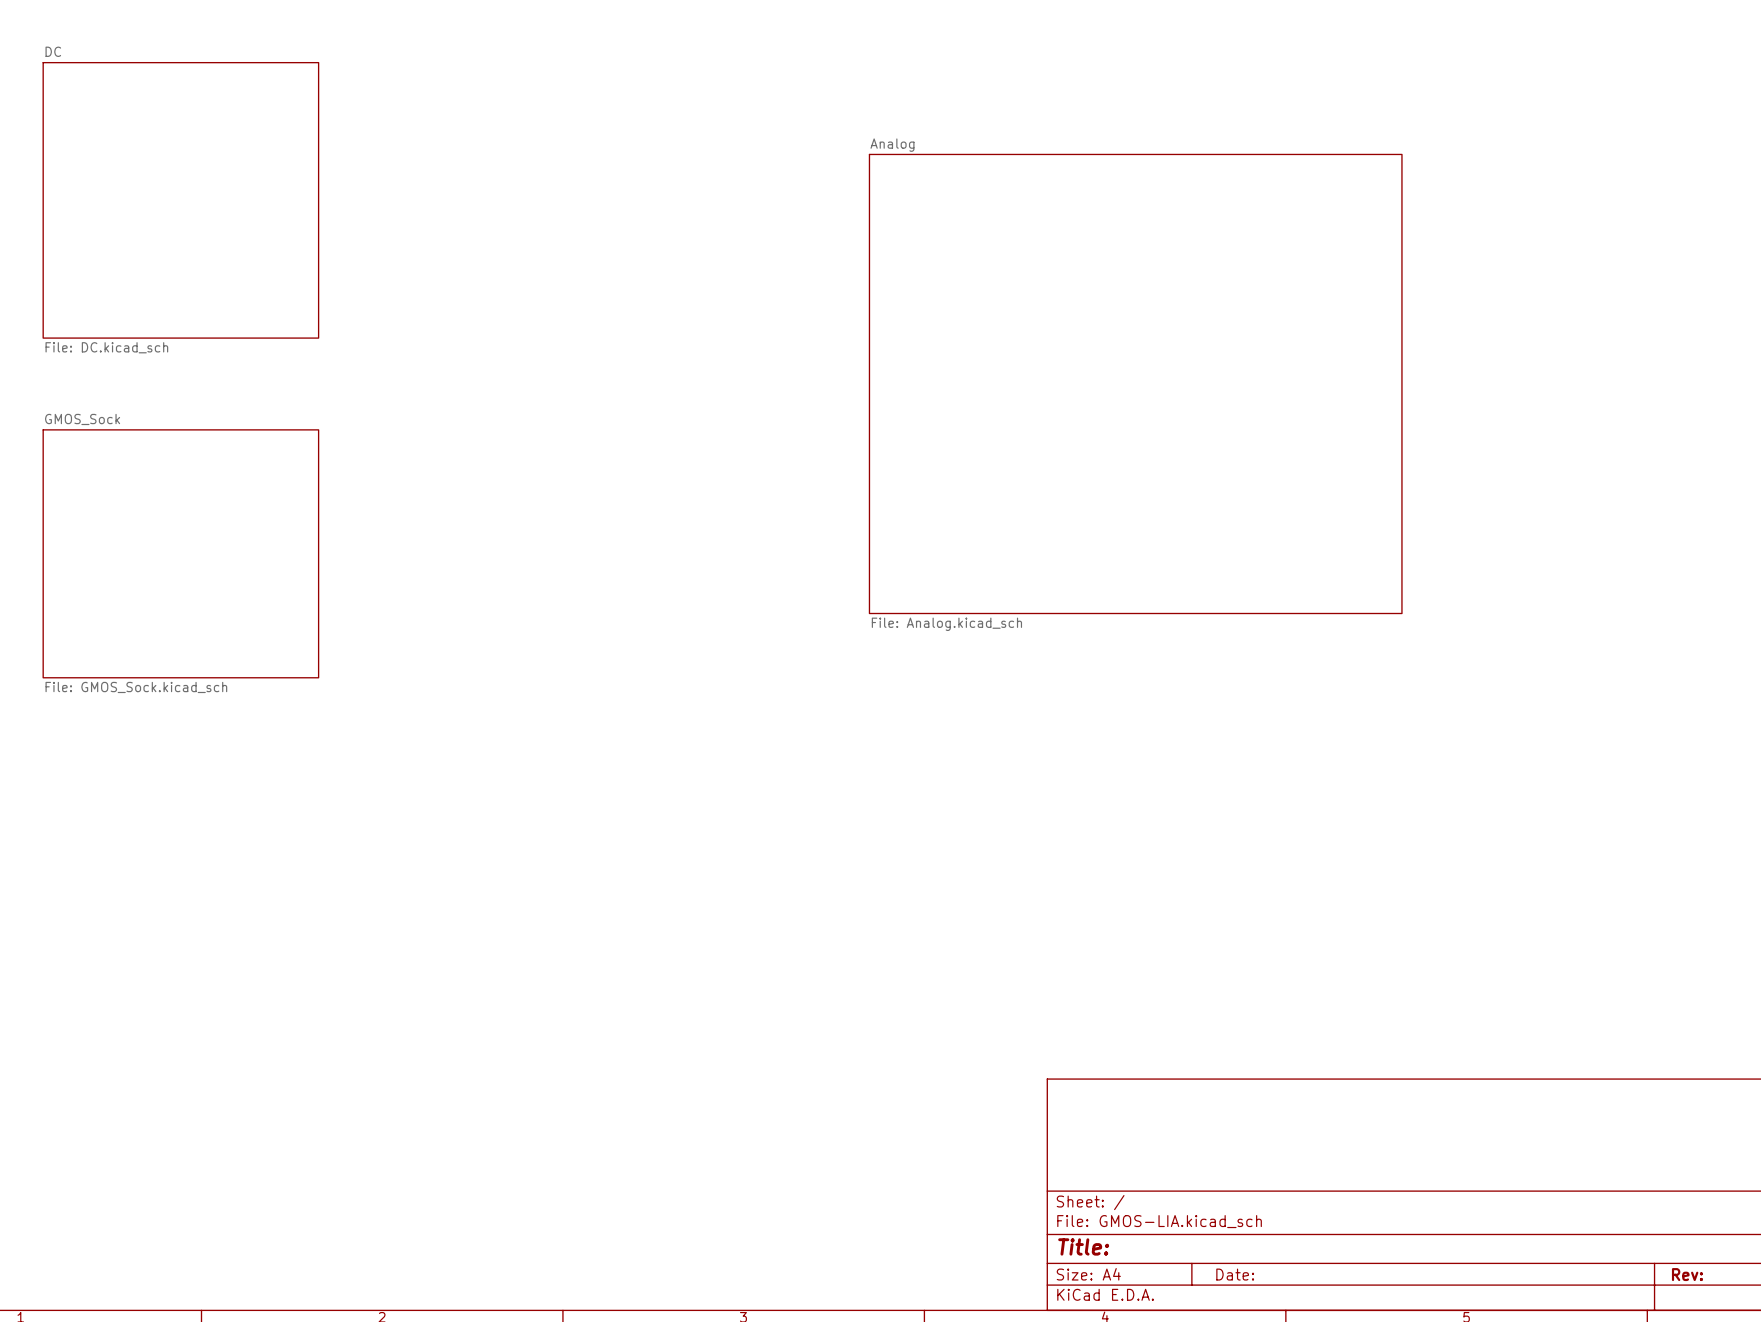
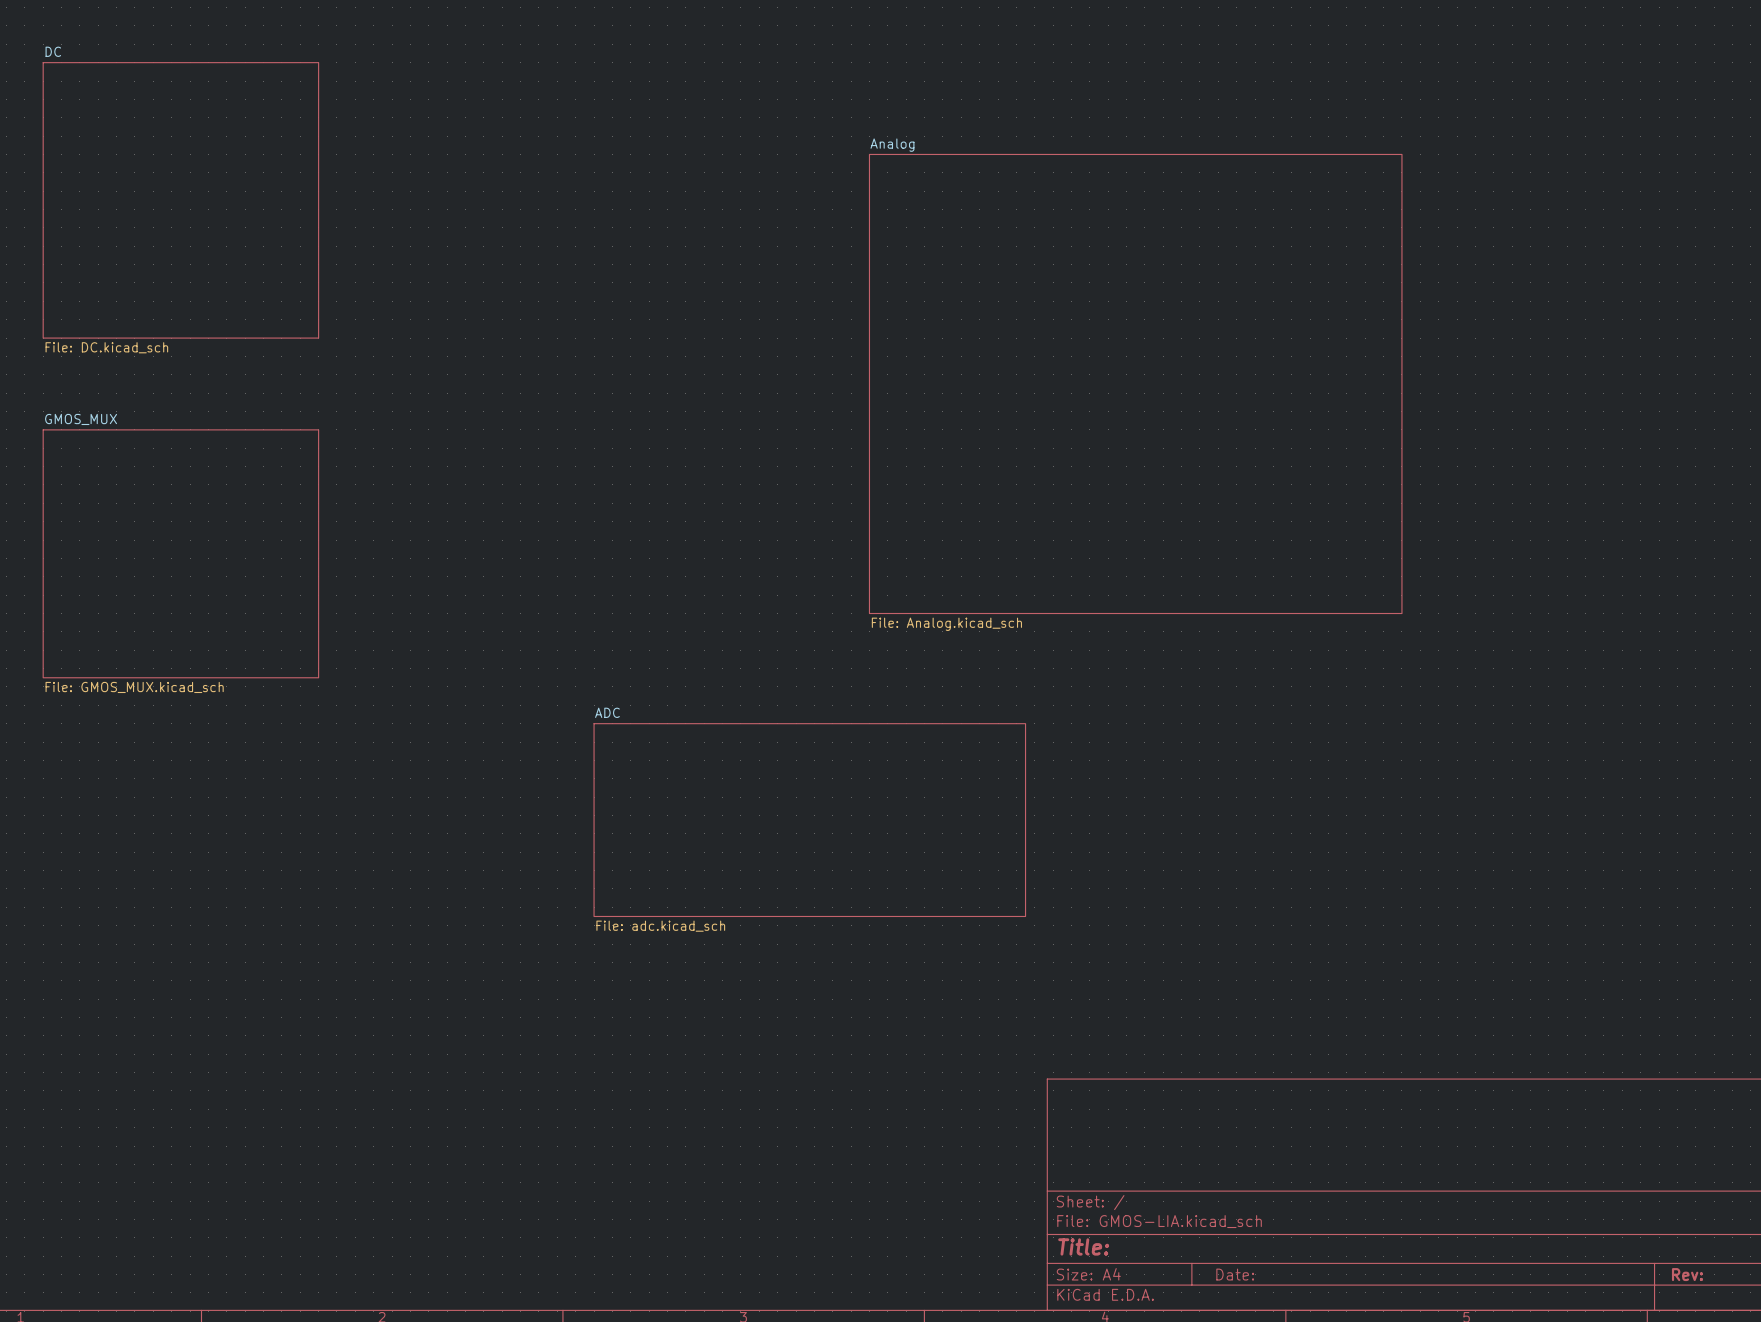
sheet GMOS_Sock name: GMOS_Sock (82, 419) -> GMOS_MUX (81, 419)
sheet GMOS_Sock value: File: GMOS_Sock.kicad_sch (136, 687) -> File: GMOS_MUX.kicad_sch (134, 687)
sheet ADC: none -> File: adc.kicad_sch (809, 820)

